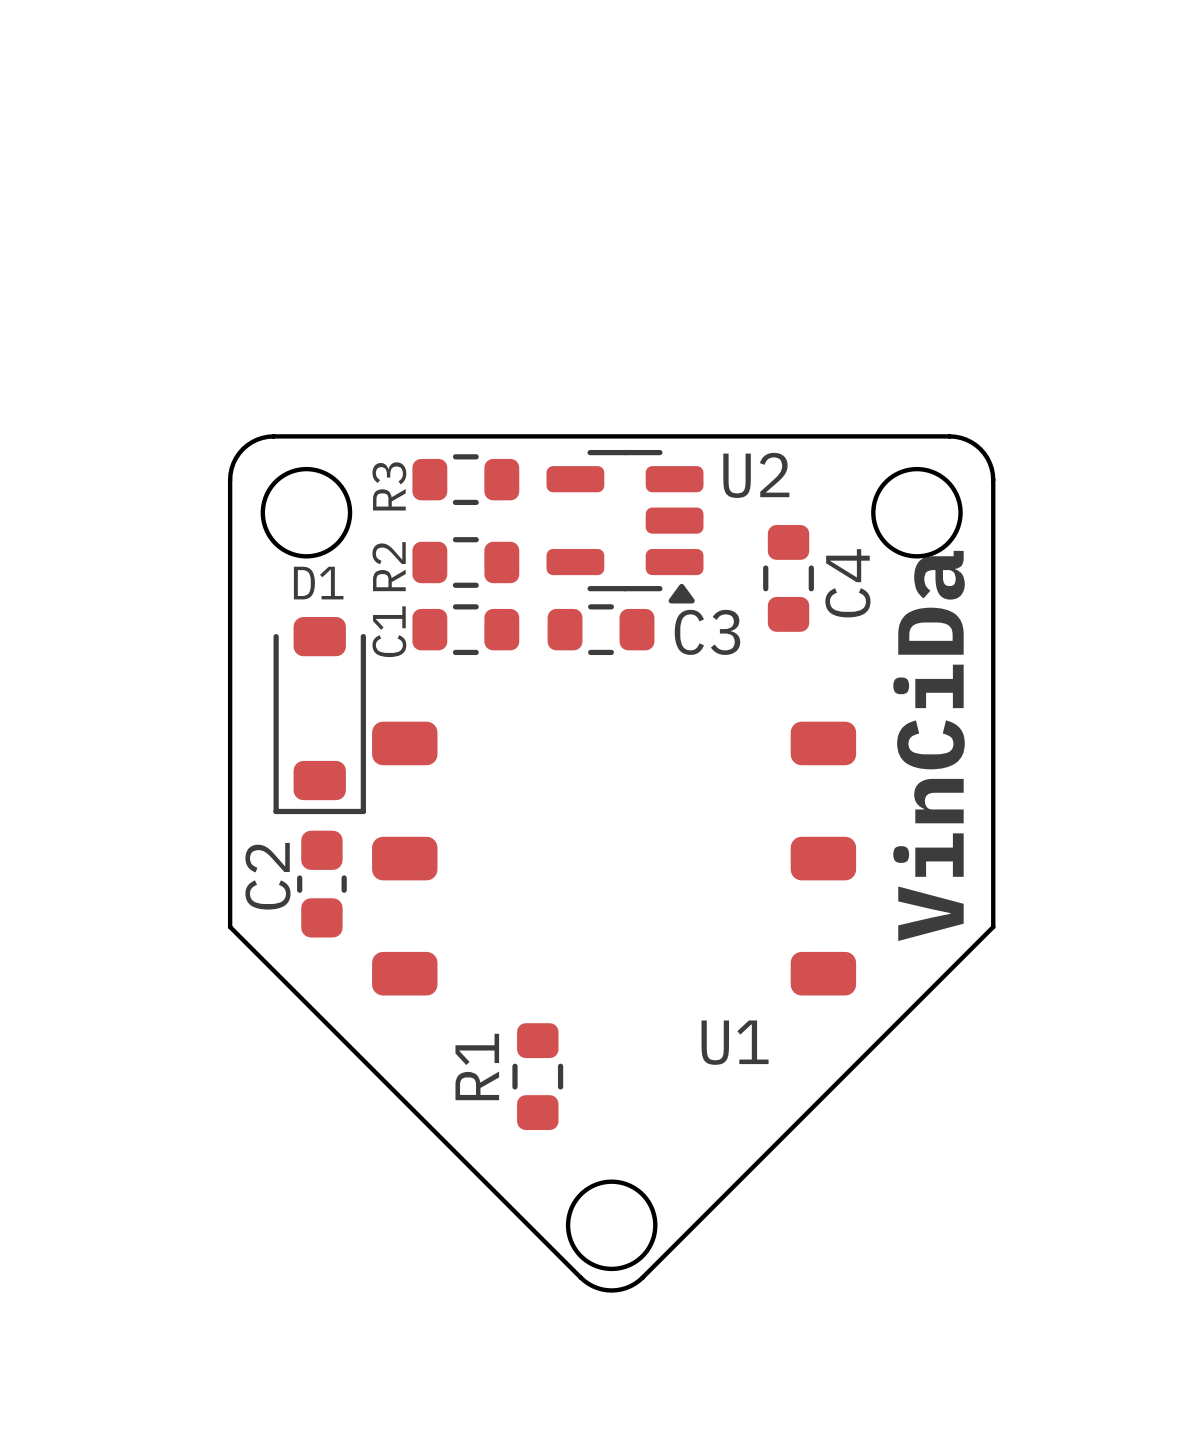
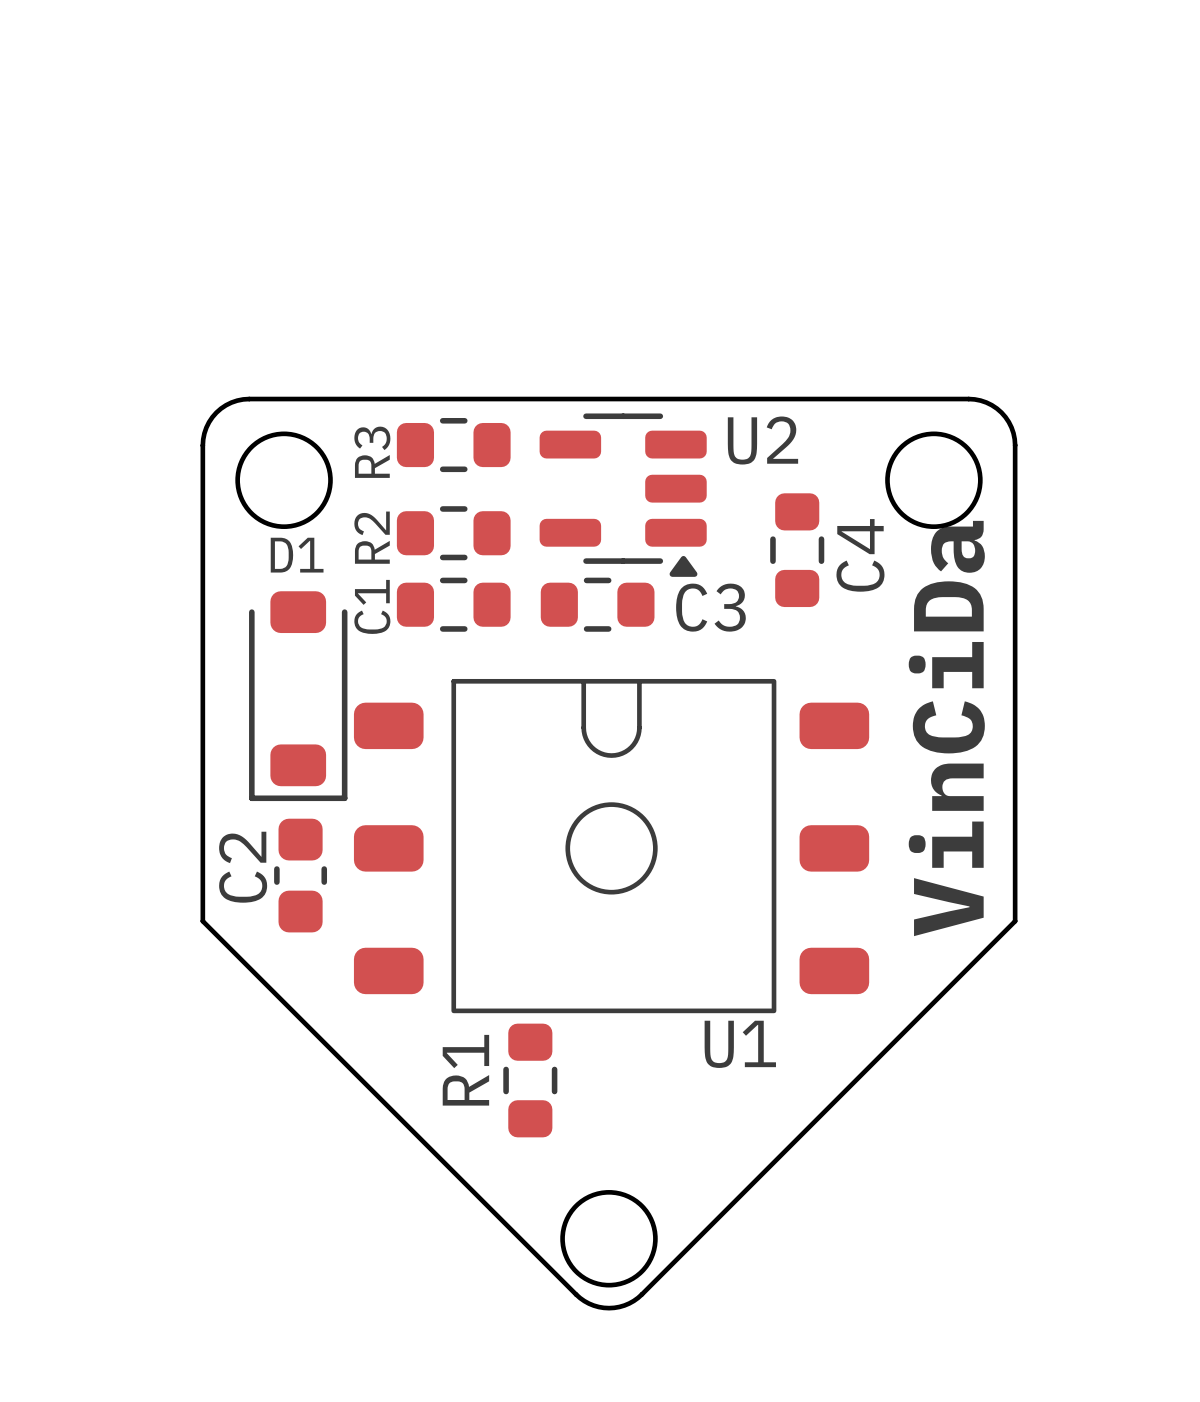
U1 footprint: [372, 721, 857, 996] -> [353, 678, 870, 1014]

